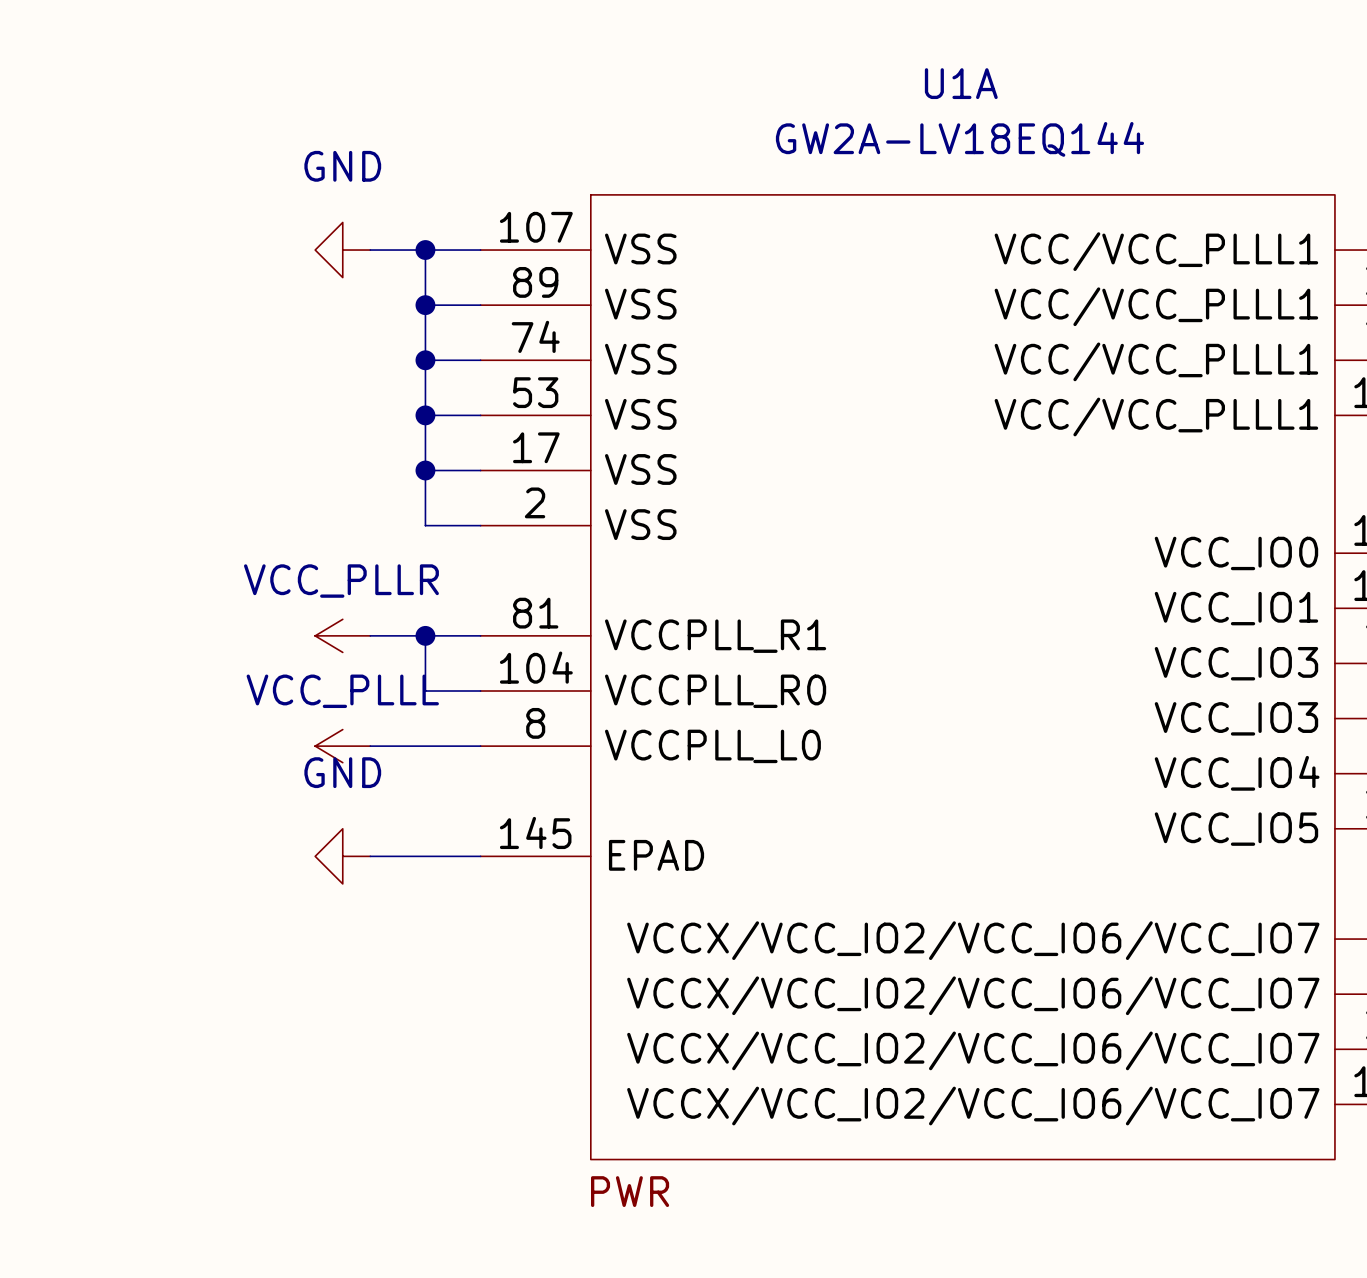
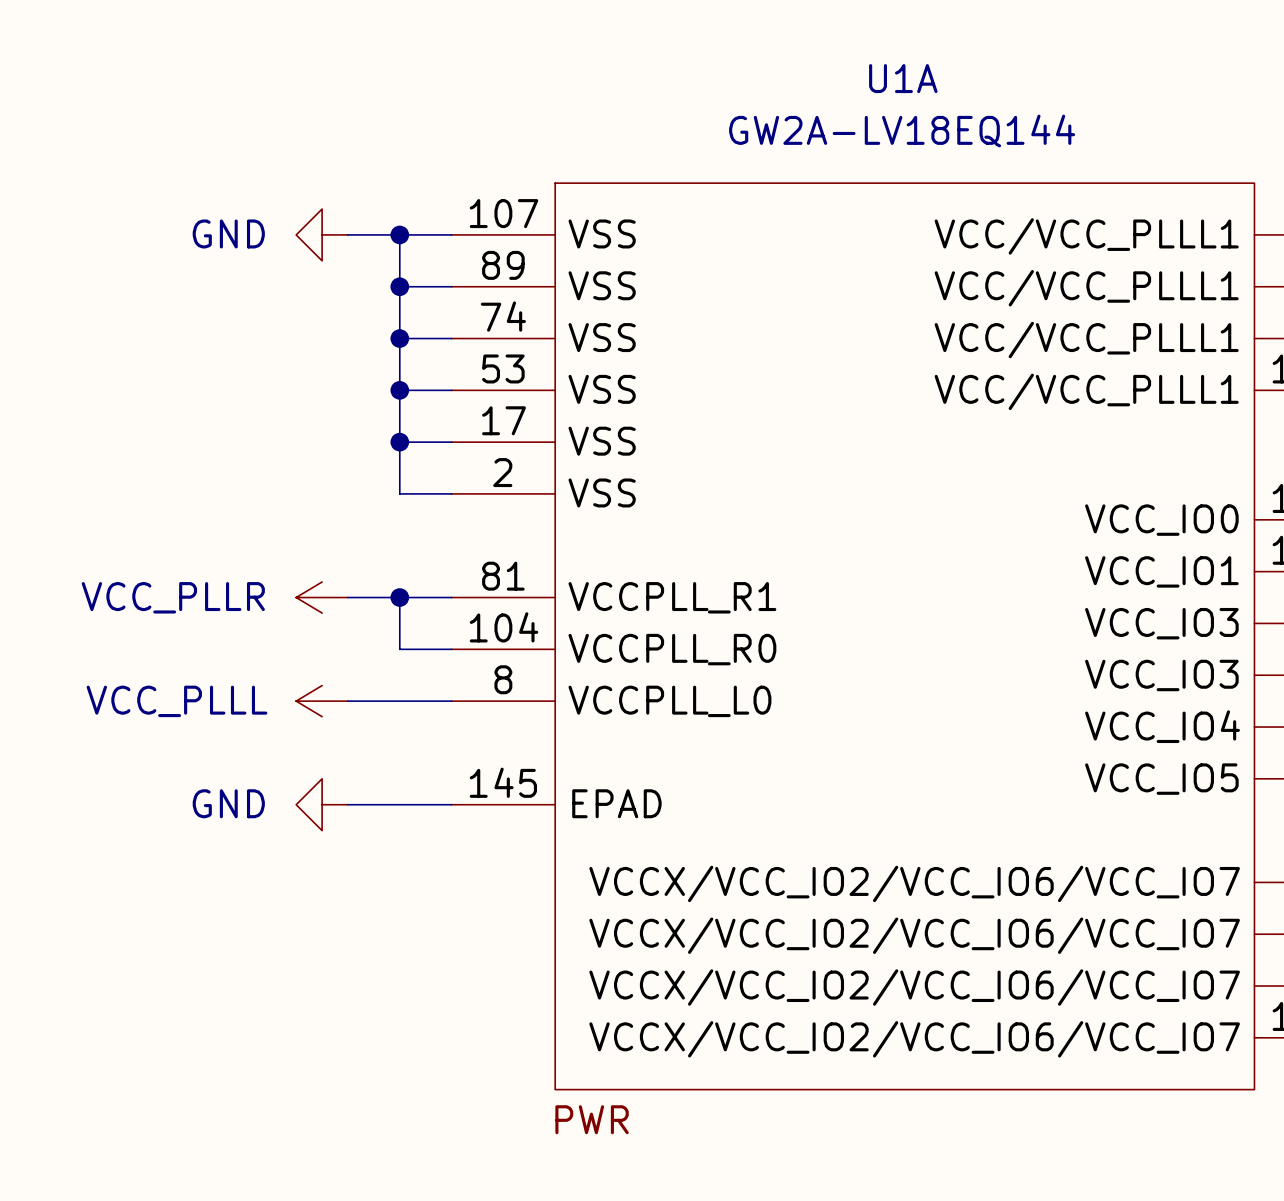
power symbol text position: GND (342, 166) -> GND (228, 233)
power symbol text position: VCC_PLLR (341, 581) -> VCC_PLLR (173, 597)
power symbol text position: VCC_PLLL (342, 691) -> VCC_PLLL (176, 701)
power symbol text position: GND (342, 772) -> GND (228, 803)

